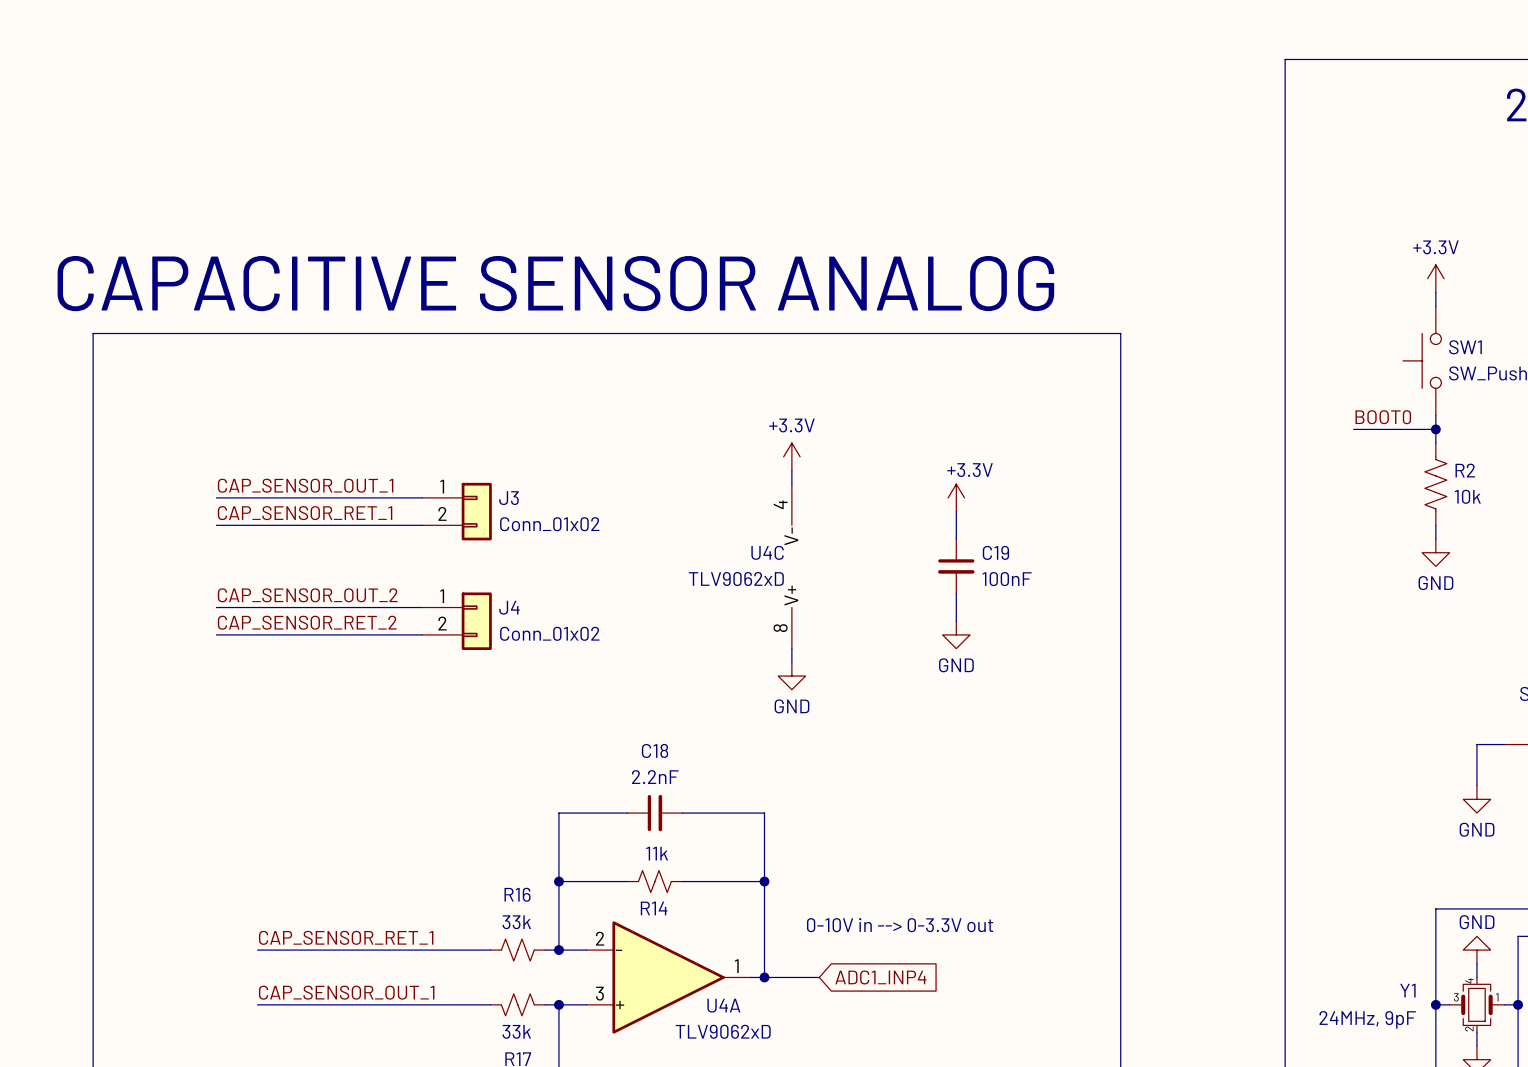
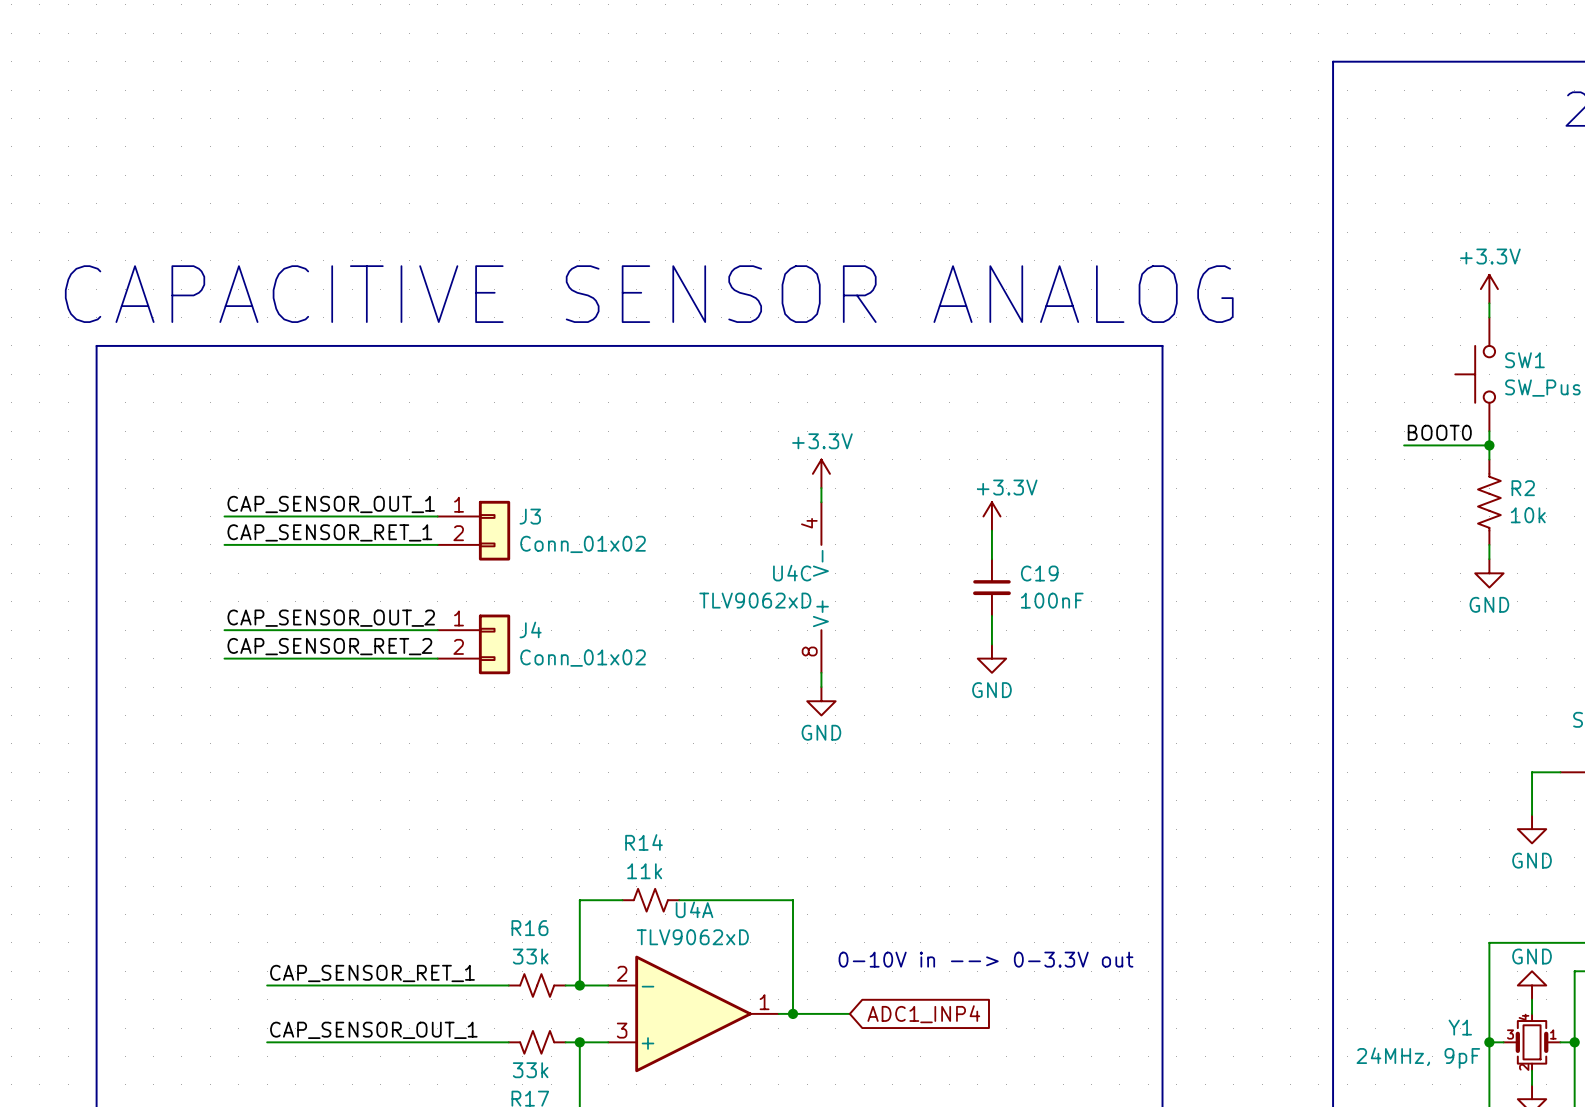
wire: (627, 813) (558, 813) (558, 867) -> (622, 900) (579, 900)
C18: 2.2nF (654, 813) -> none
wire: (682, 813) (764, 813) (764, 867) -> (679, 900) (793, 900)
wire: (558, 881) (627, 881) -> none
junction: (558, 881) -> none
R14 position: (654, 881) -> (650, 900)
wire: (682, 881) (764, 881) -> none
junction: (764, 881) -> none
R14 name position: R14 (654, 908) -> R14 (644, 842)
U4A name position: U4A (723, 1005) -> U4A (694, 909)
U4A value position: TLV9062xD (723, 1031) -> TLV9062xD (692, 937)

